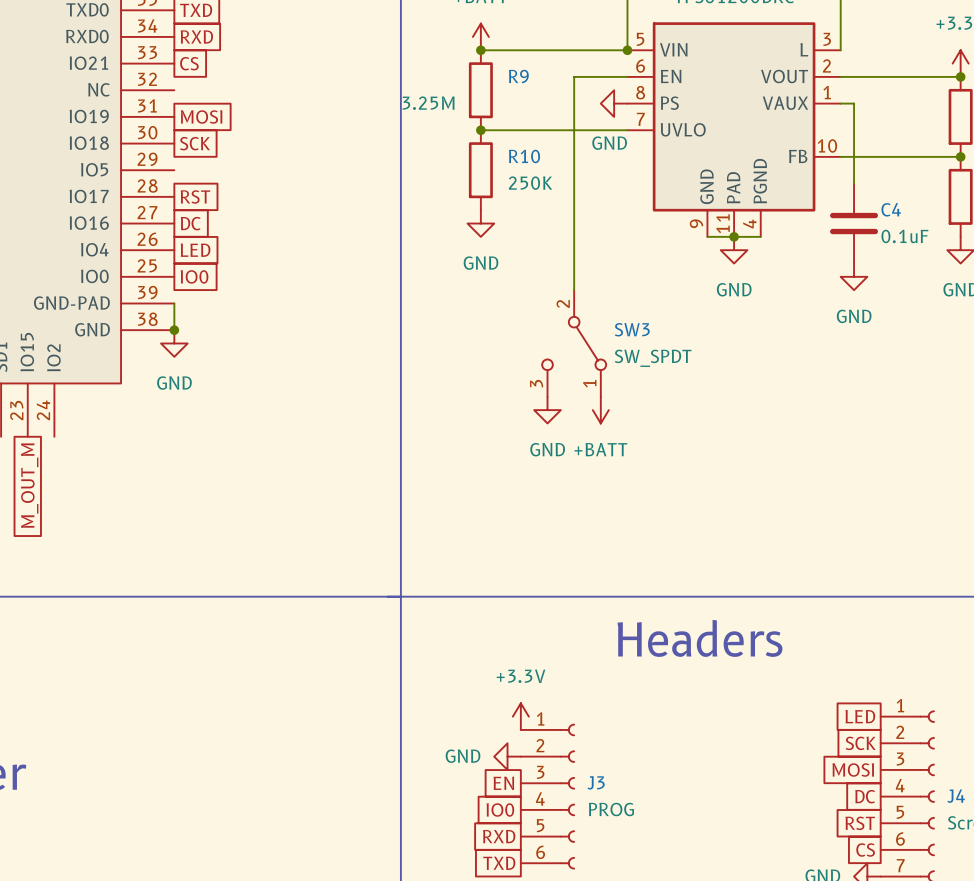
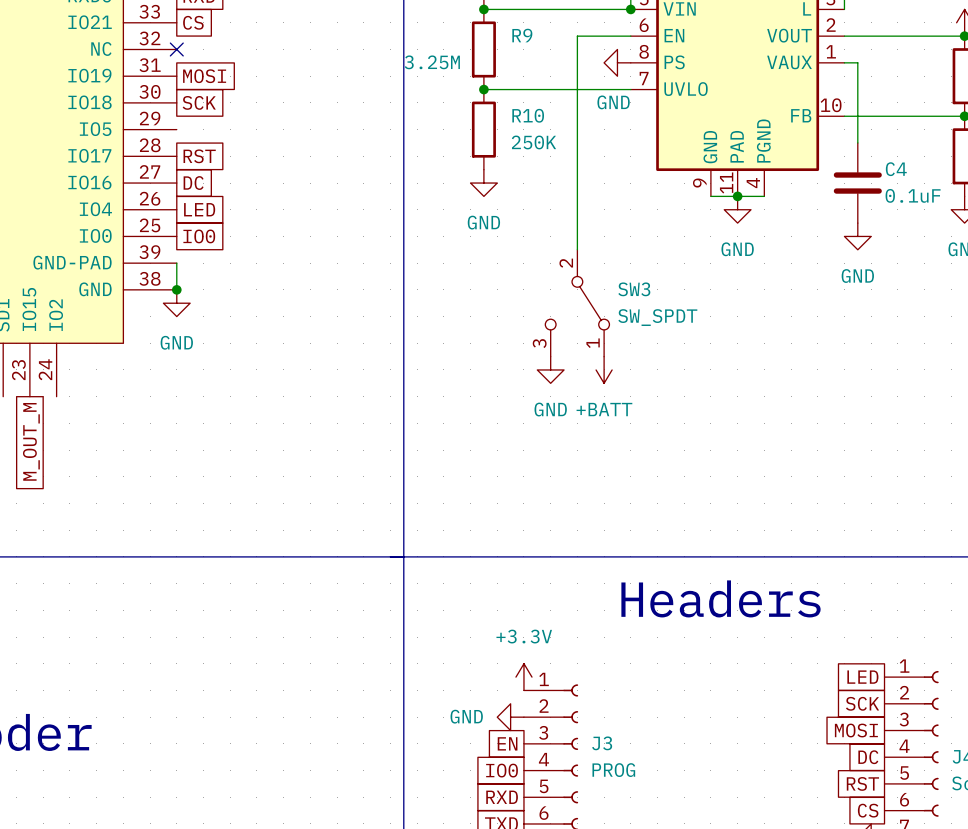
no-connect mark: none -> (176, 49)

